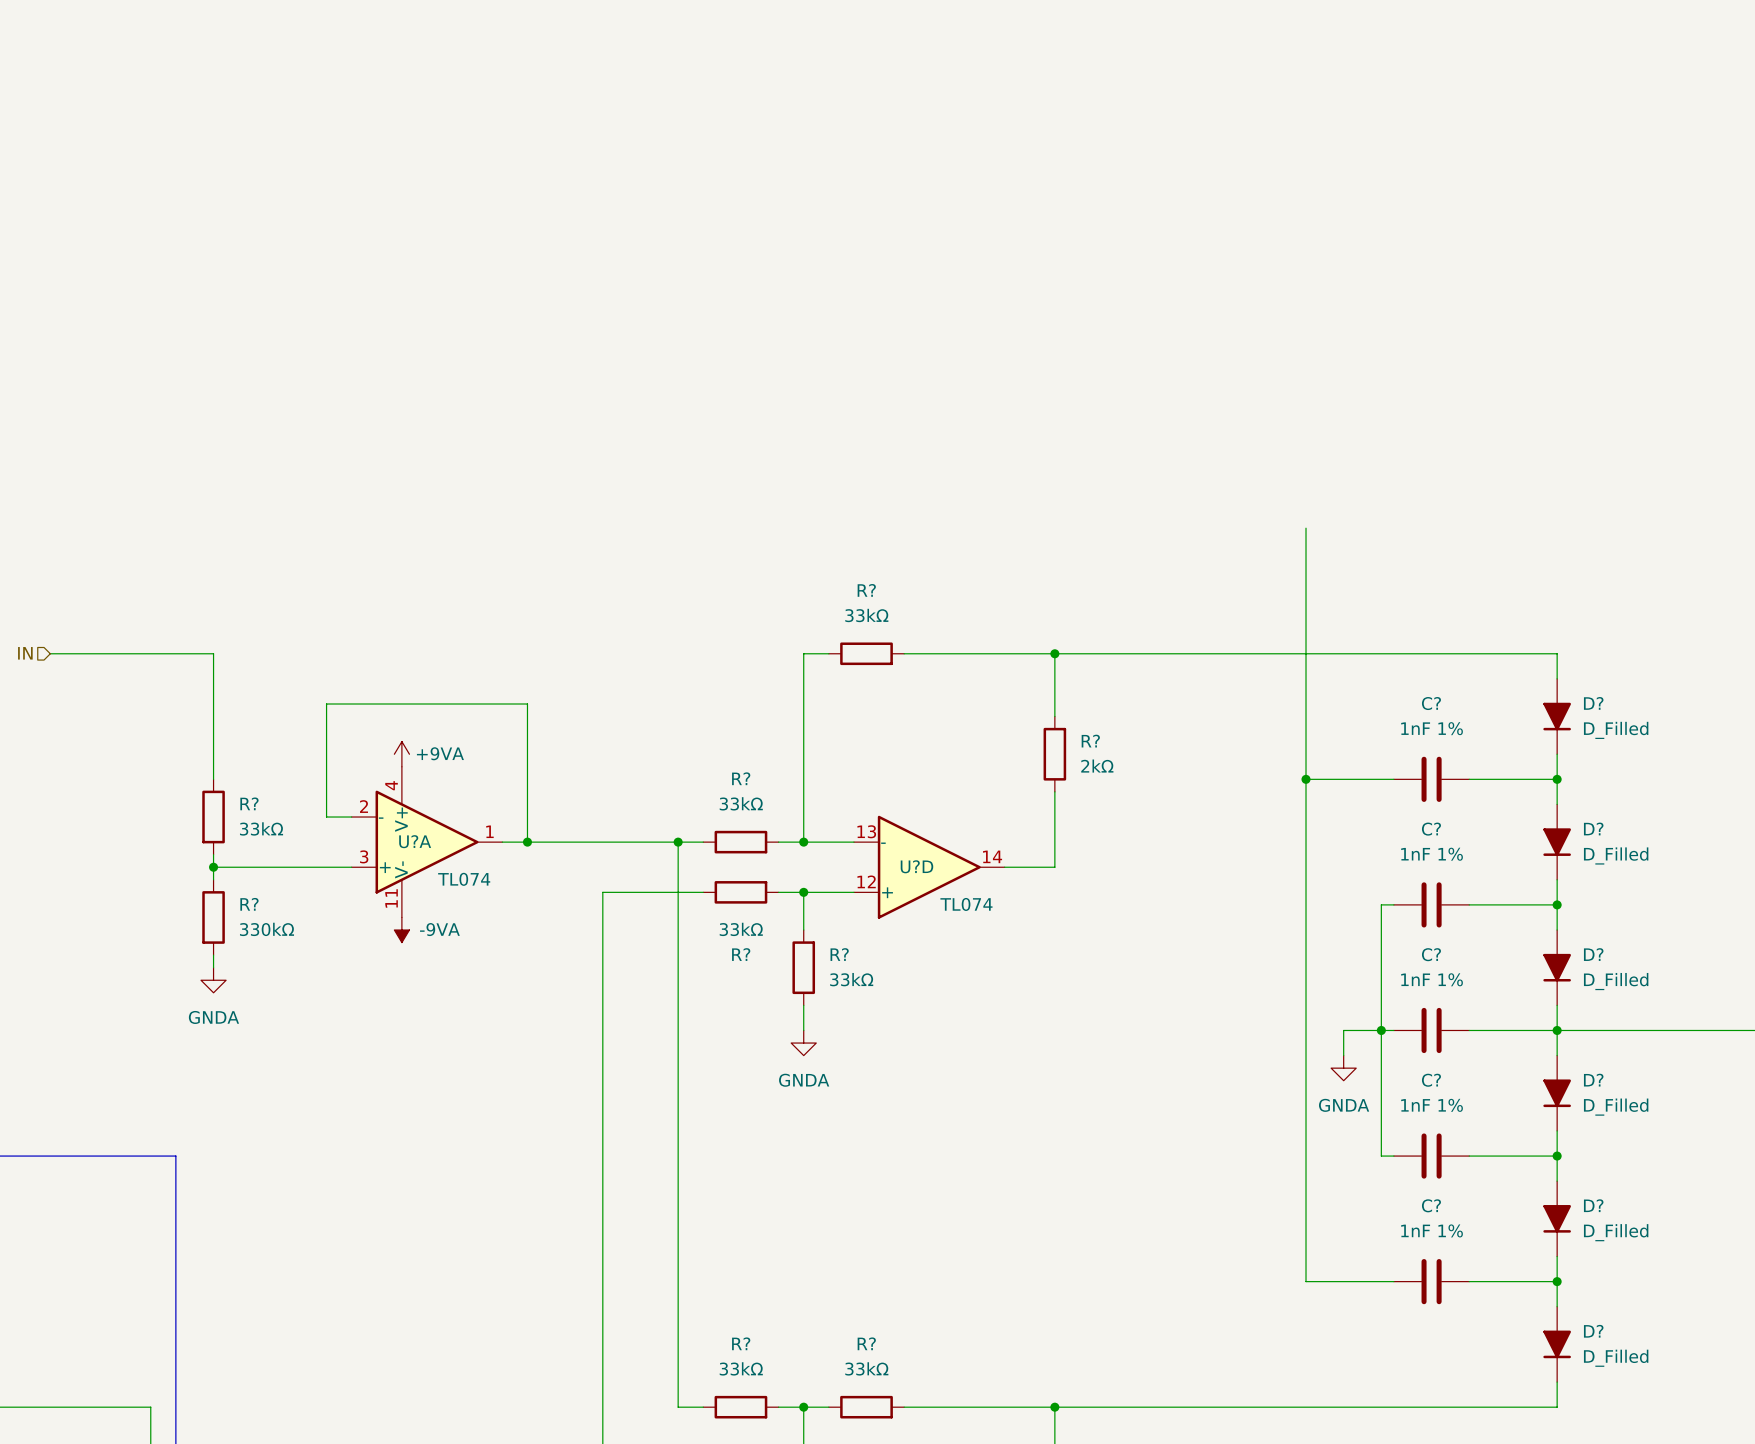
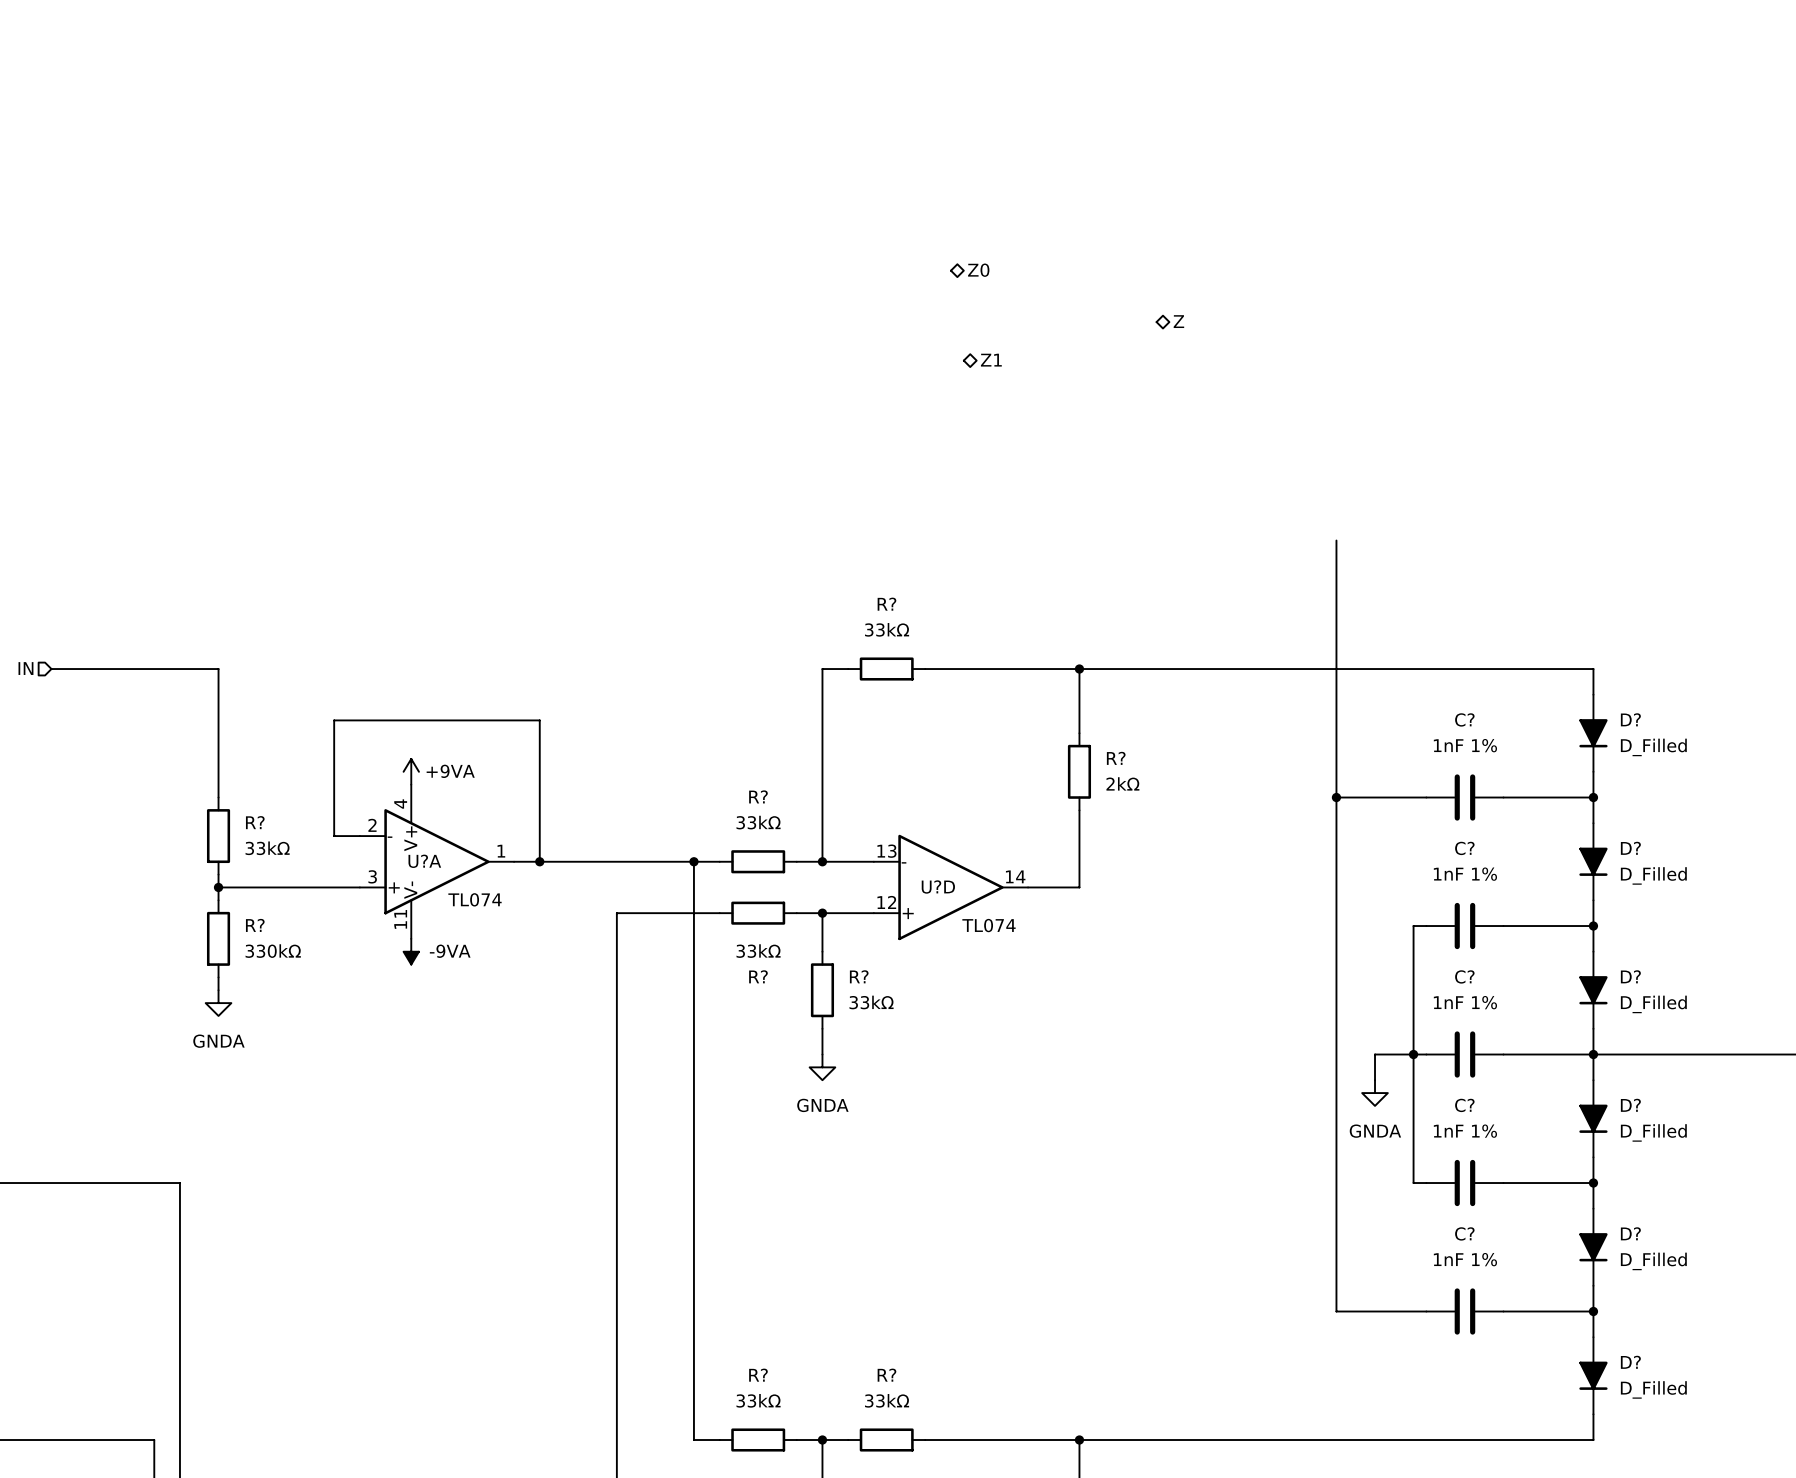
hierarchical label: none -> Z0 (978, 270)
hierarchical label: none -> Z (1178, 321)
hierarchical label: none -> Z1 (991, 360)

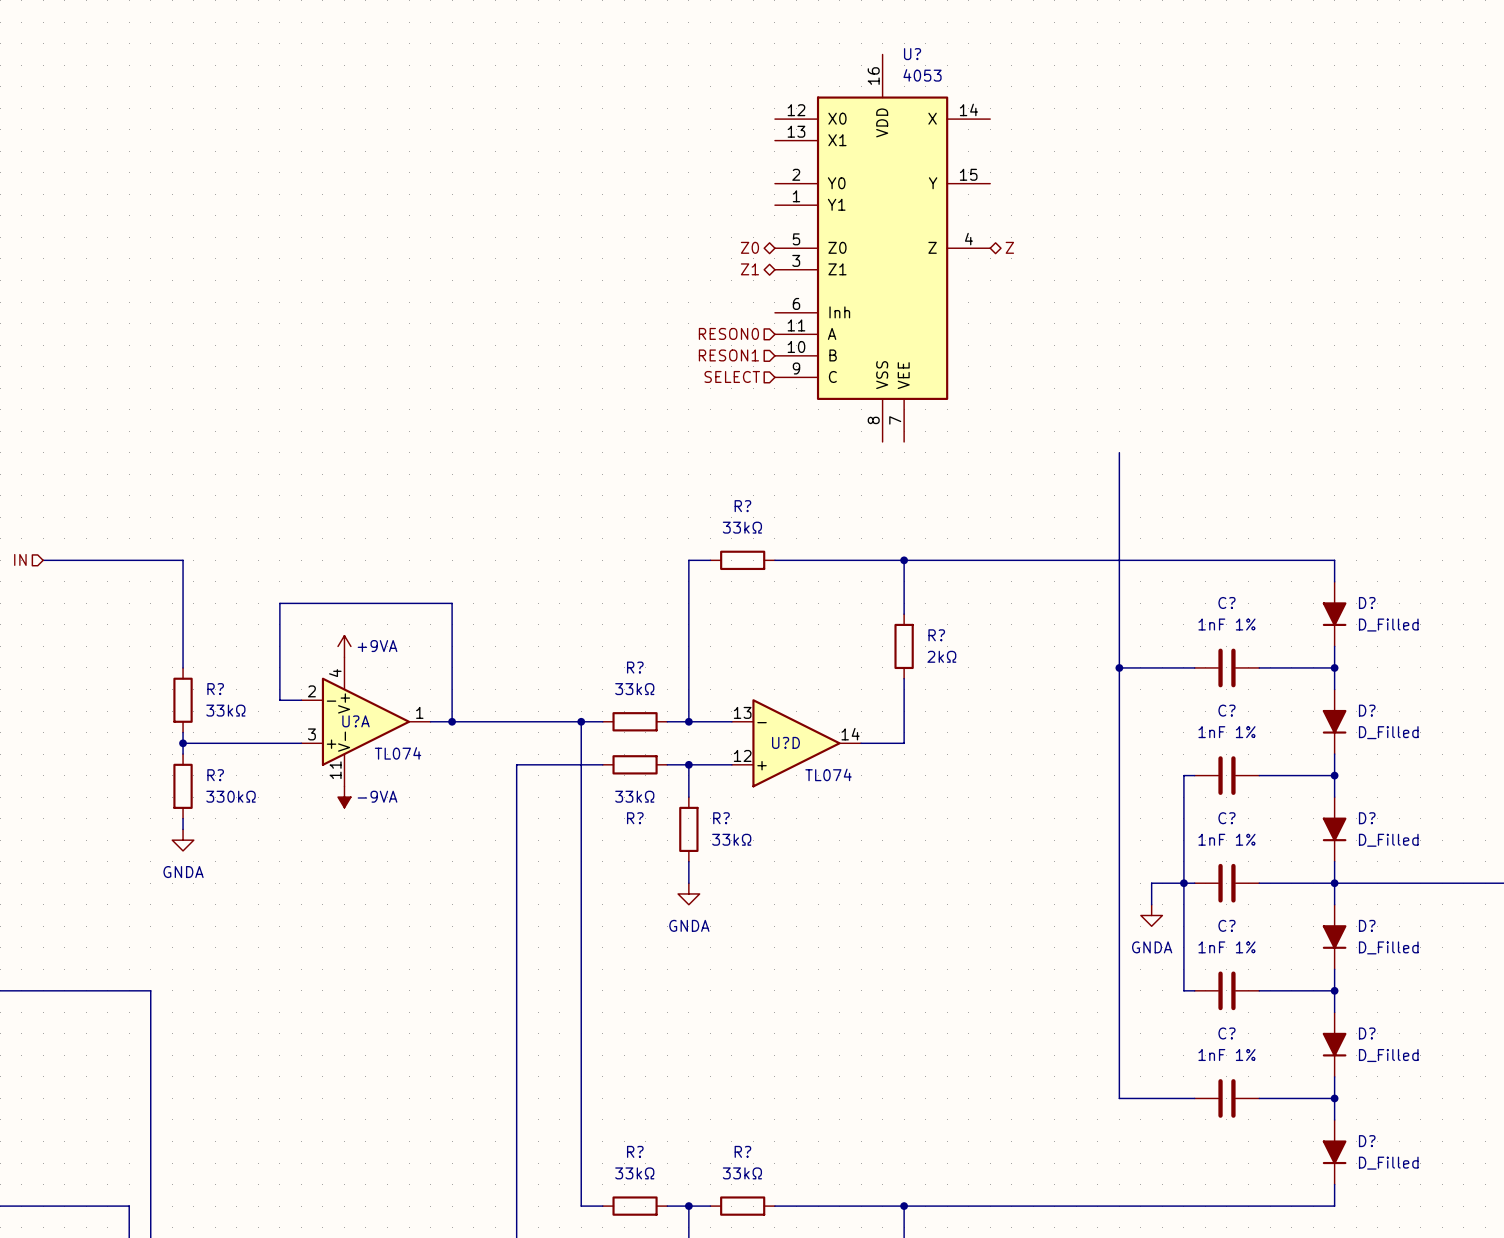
hierarchical label rotation: 0° (978, 270) -> 180° (749, 247)
hierarchical label position: Z0 (978, 270) -> Z0 (749, 247)
U?: none -> 4053 (882, 248)
hierarchical label position: Z (1178, 321) -> Z (1009, 247)
hierarchical label rotation: 0° (991, 360) -> 180° (749, 269)
hierarchical label position: Z1 (991, 360) -> Z1 (749, 269)
hierarchical label: none -> RESON0 (728, 333)
hierarchical label: none -> RESON1 (728, 355)
hierarchical label: none -> SELECT (732, 376)

